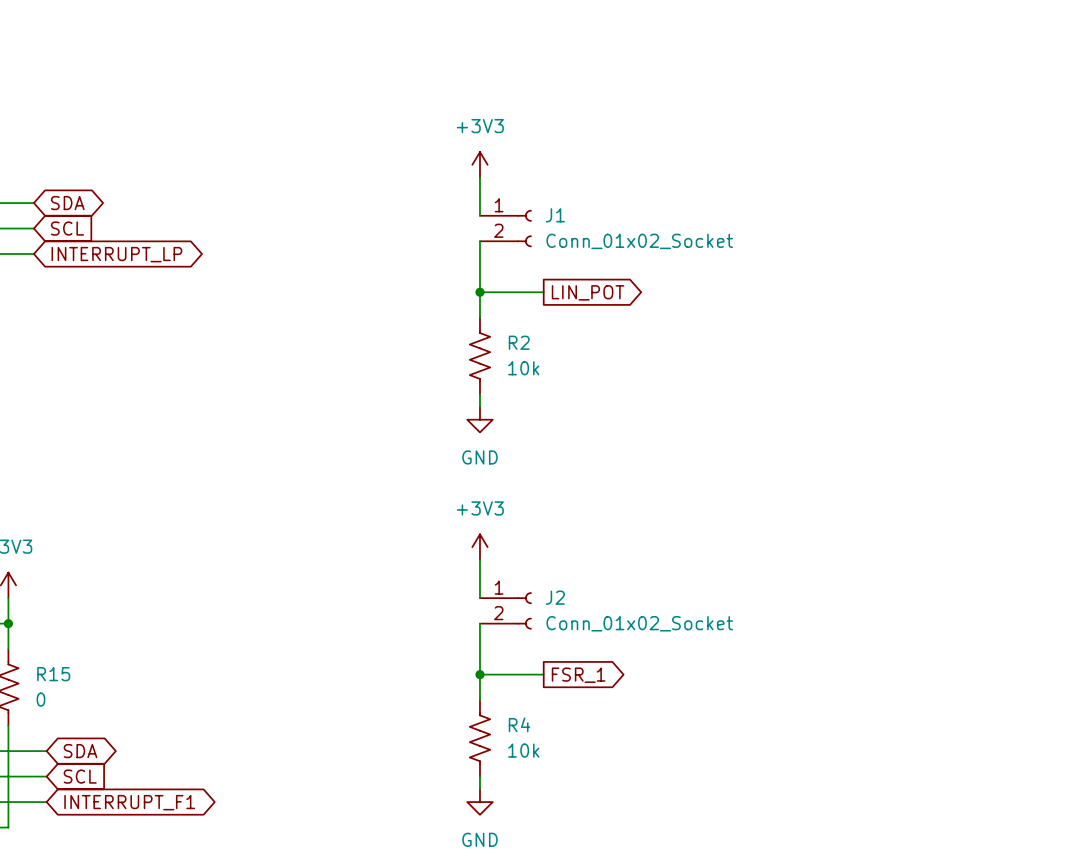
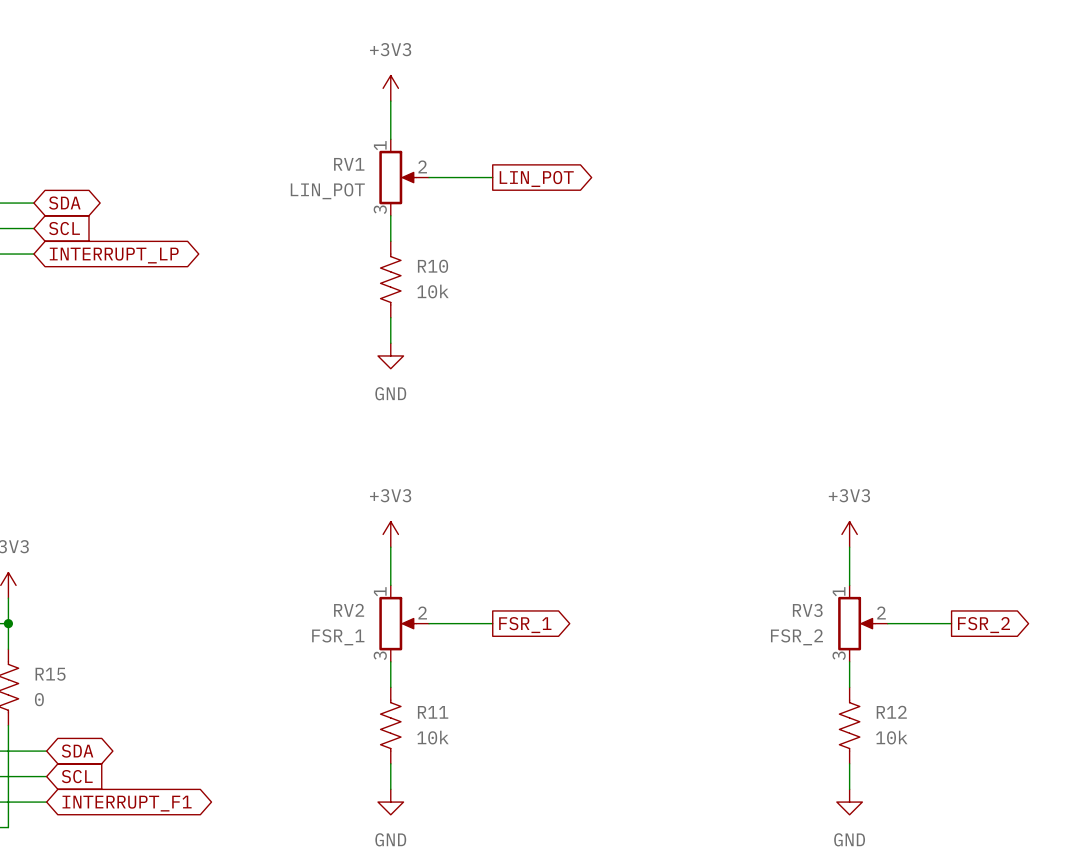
power symbol position: +3V3 (479, 164) -> +3V3 (390, 88)
RV1: none -> LIN_POT (404, 177)
wire: (479, 177) (479, 215) -> (390, 101) (390, 139)
wire: none -> (390, 215) (390, 241)
J1: Conn_01x02_Socket (505, 228) -> none
wire: (479, 241) (479, 317) -> none
R10: none -> 10k (390, 279)
wire: (479, 292) (543, 292) -> (429, 177) (492, 177)
junction: (479, 292) -> none
global label position: LIN_POT (588, 292) -> LIN_POT (536, 178)
wire: none -> (390, 317) (390, 343)
R2: 10k (479, 355) -> none
wire: (479, 394) (479, 406) -> none
power symbol position: GND (479, 419) -> GND (390, 355)
power symbol: none -> +3V3 (849, 534)
power symbol position: +3V3 (479, 547) -> +3V3 (390, 534)
wire: none -> (849, 547) (849, 585)
wire: (479, 559) (479, 598) -> (390, 547) (390, 585)
J2: Conn_01x02_Socket (505, 610) -> none
RV2: none -> FSR_1 (404, 623)
wire: (479, 623) (479, 700) -> none
RV3: none -> FSR_2 (862, 623)
wire: none -> (887, 623) (951, 623)
global label: none -> FSR_2 (983, 625)
wire: none -> (390, 661) (390, 687)
wire: none -> (849, 661) (849, 687)
wire: (479, 674) (543, 674) -> (429, 623) (492, 623)
junction: (479, 674) -> none
global label position: FSR_1 (578, 675) -> FSR_1 (525, 625)
R11: none -> 10k (390, 725)
R12: none -> 10k (849, 725)
R4: 10k (479, 738) -> none
wire: none -> (390, 763) (390, 789)
wire: none -> (849, 763) (849, 789)
wire: (479, 776) (479, 789) -> none
power symbol position: GND (479, 802) -> GND (390, 802)
power symbol: none -> GND (849, 802)

